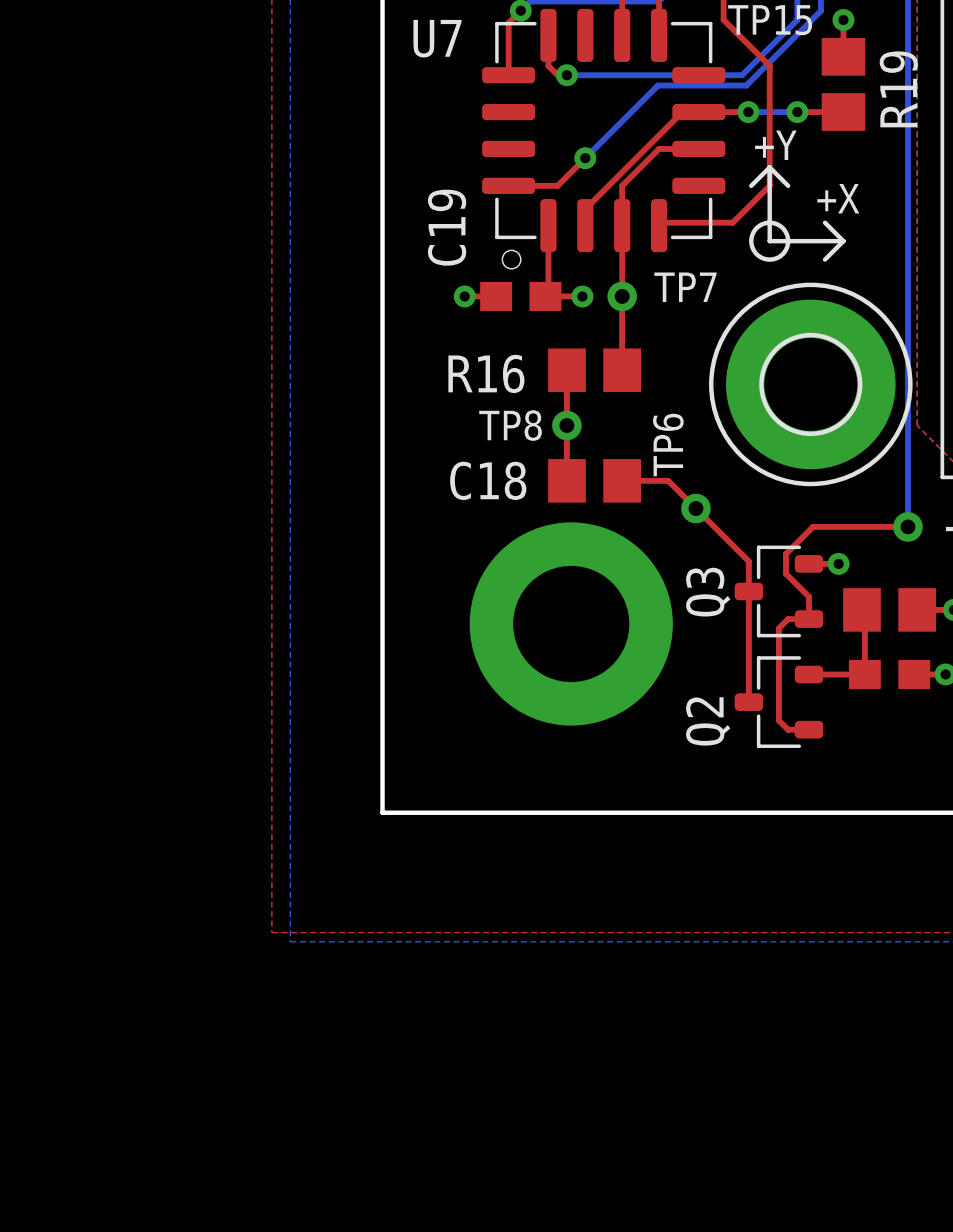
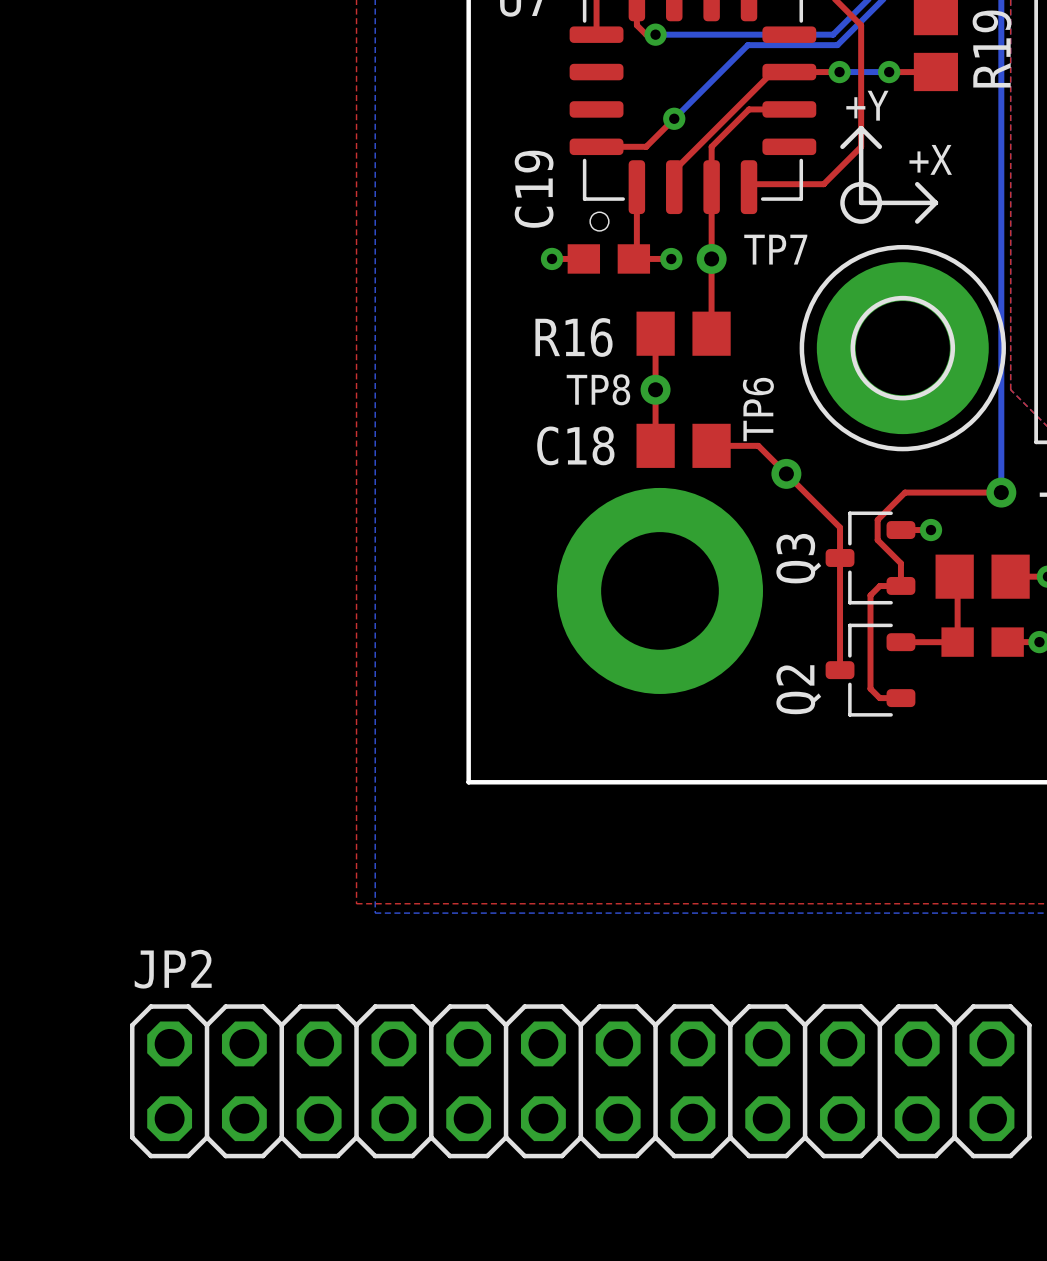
JP2: none -> (580, 1081)

